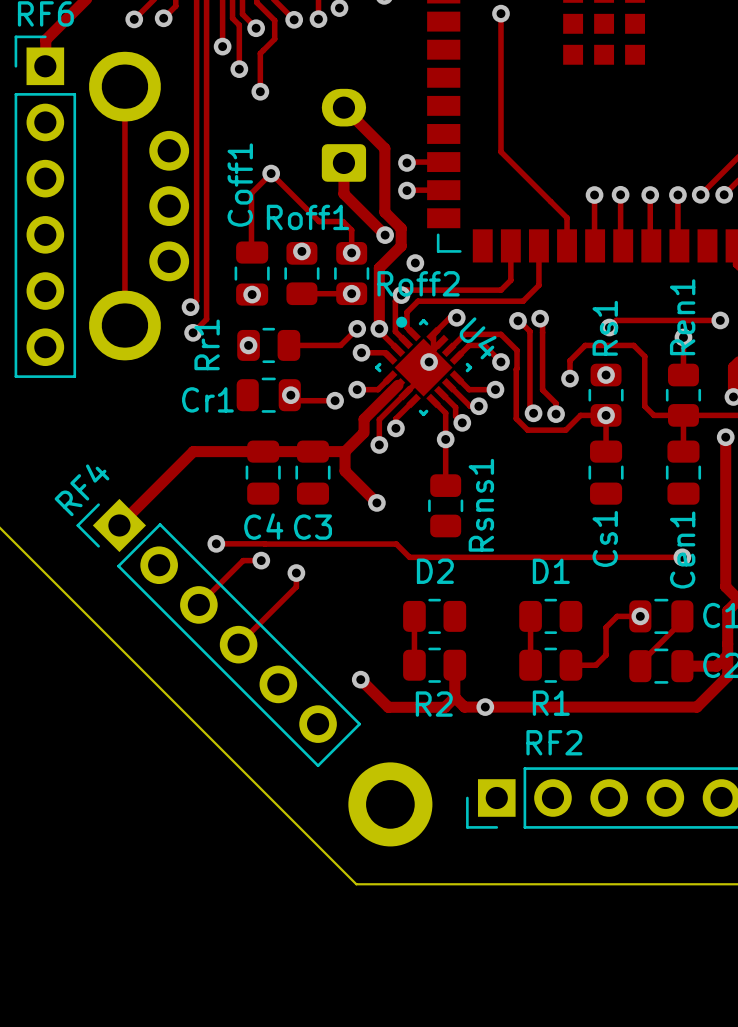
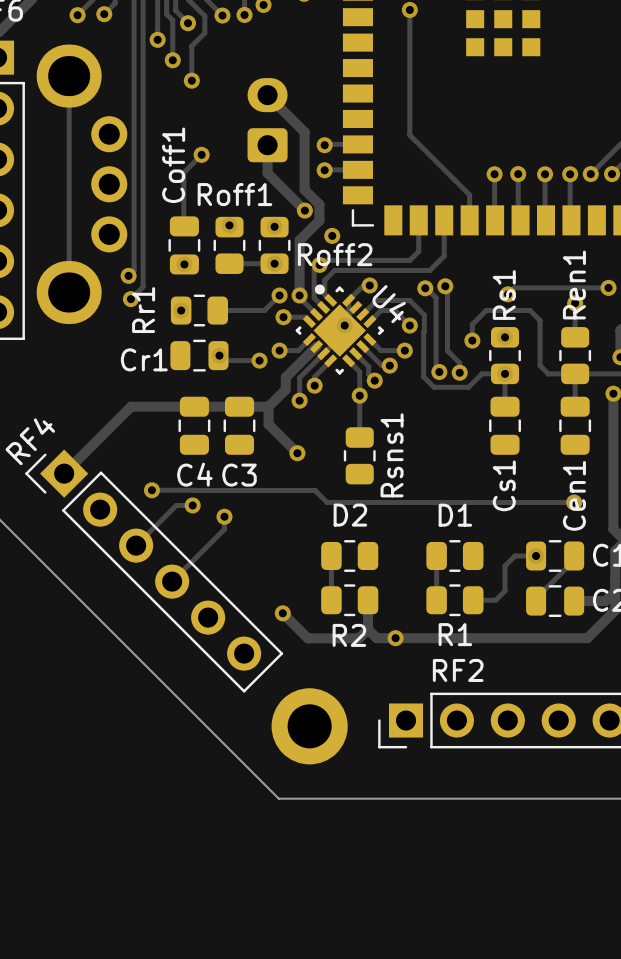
track: (271, 173) (319, 221) (343, 221) (351, 230) (351, 252) -> none

